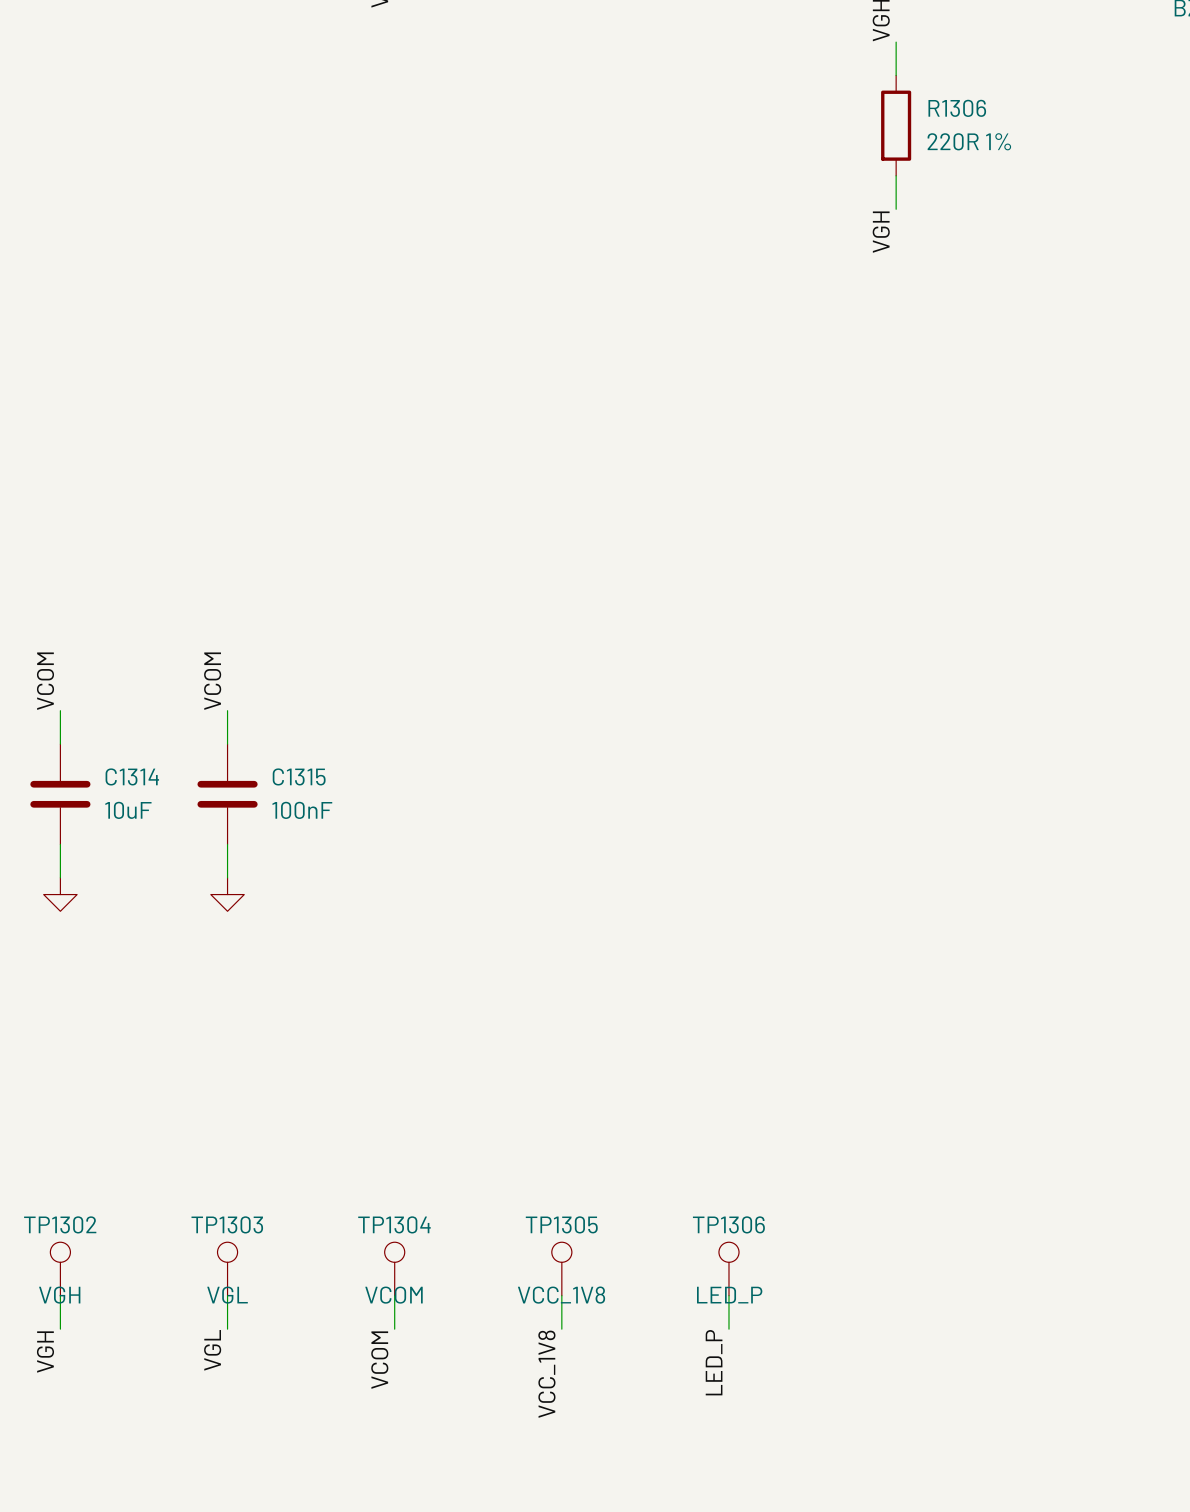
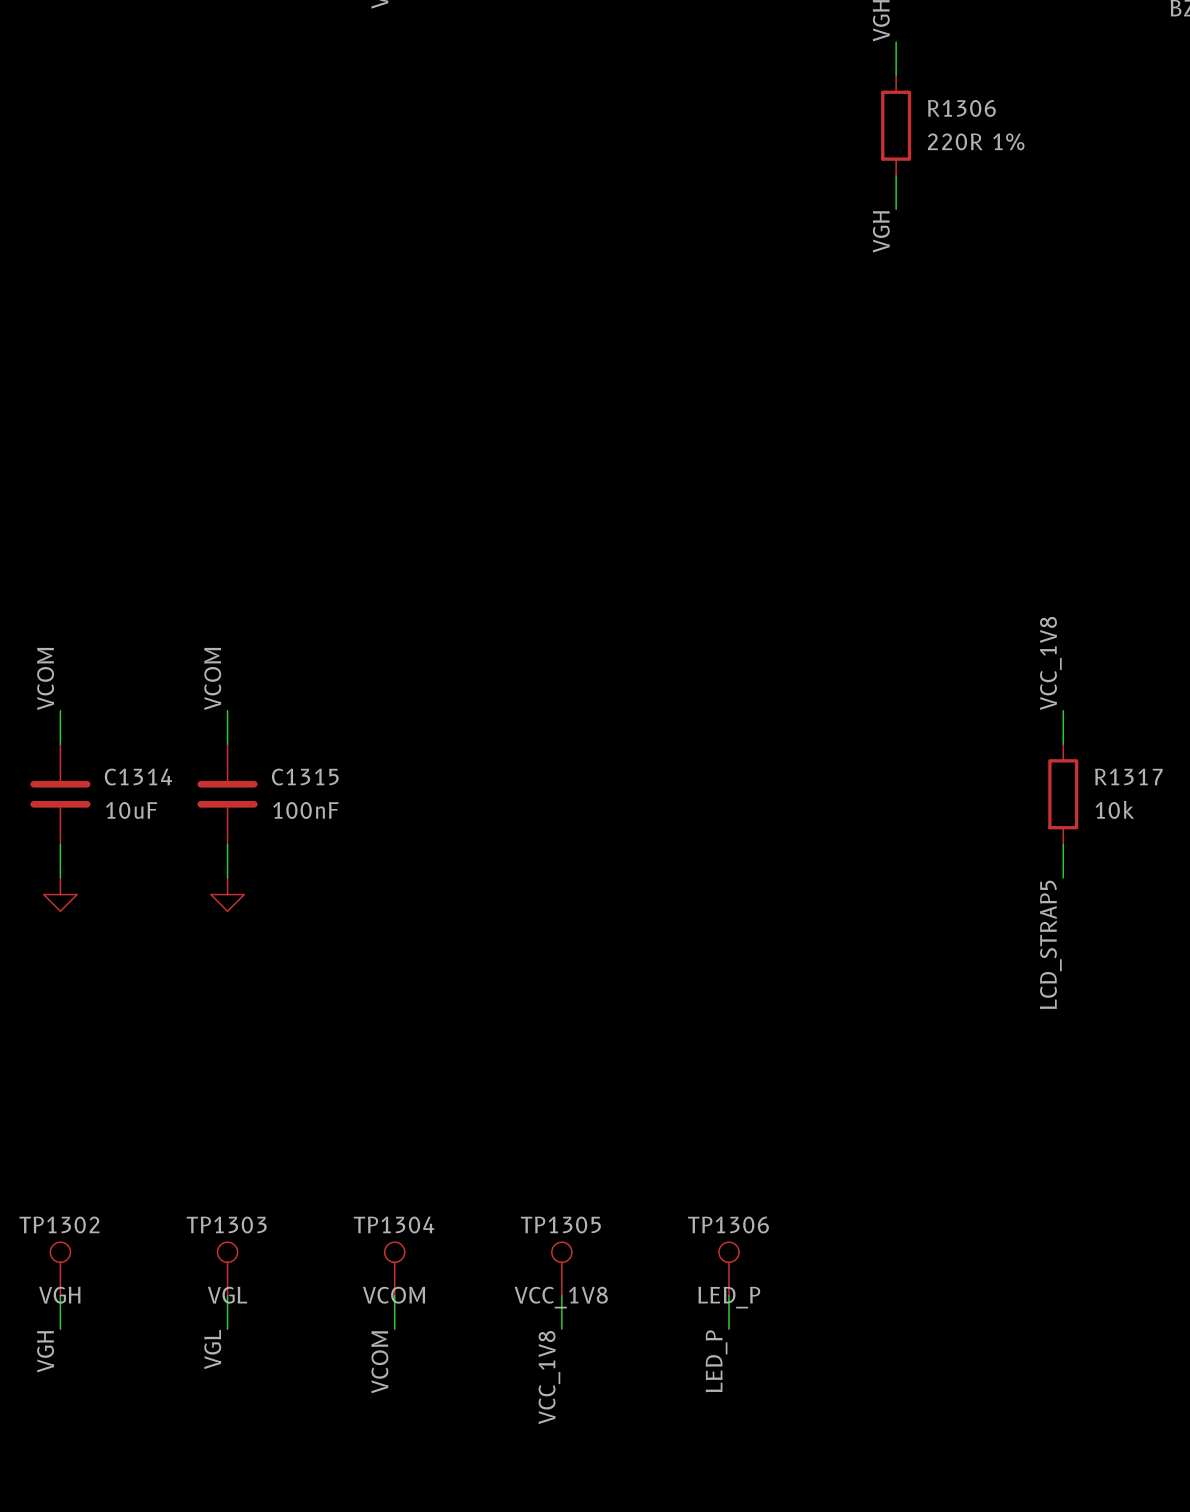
label: none -> VCC_1V8 (1050, 663)
wire: none -> (1063, 710) (1063, 744)
R1317: none -> 10k (1063, 794)
wire: none -> (1063, 844) (1063, 877)
label: none -> LCD_STRAP5 (1050, 944)

